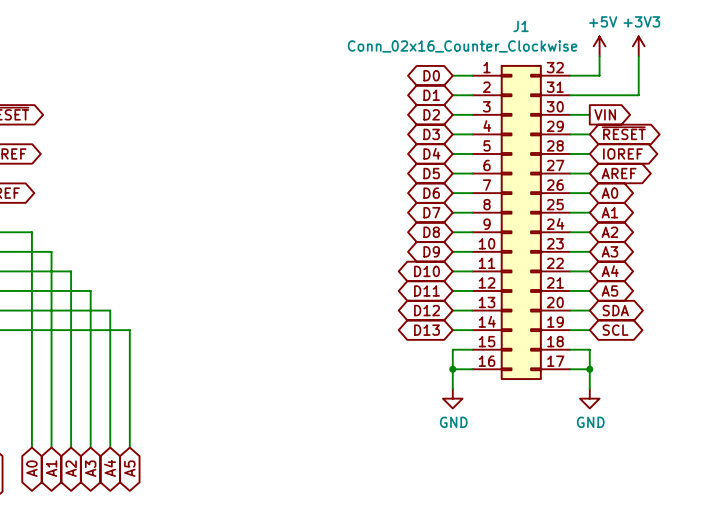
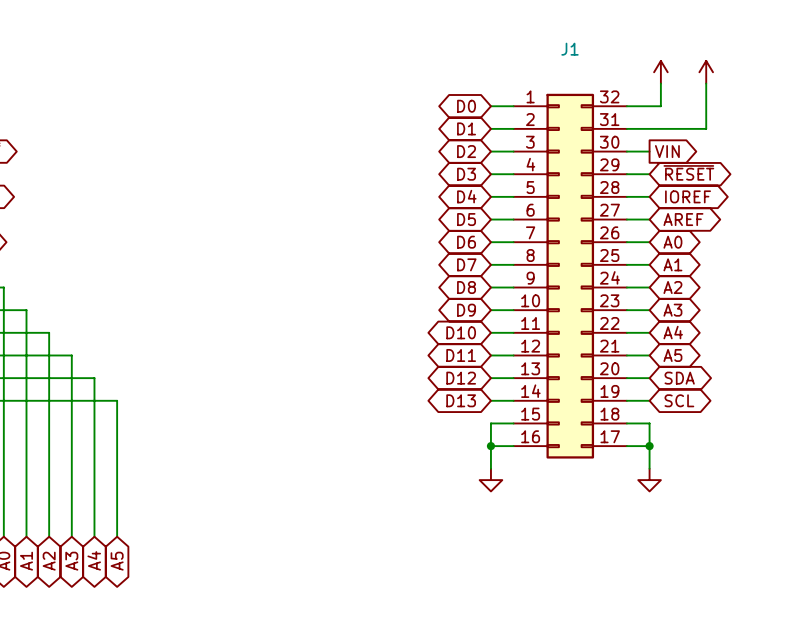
power symbol text: +5V (603, 21) -> none
power symbol text: +3V3 (641, 21) -> none
J1 value: Conn_02x16_Counter_Clockwise (462, 46) -> none
power symbol text: GND (453, 422) -> none
power symbol text: GND (590, 422) -> none

